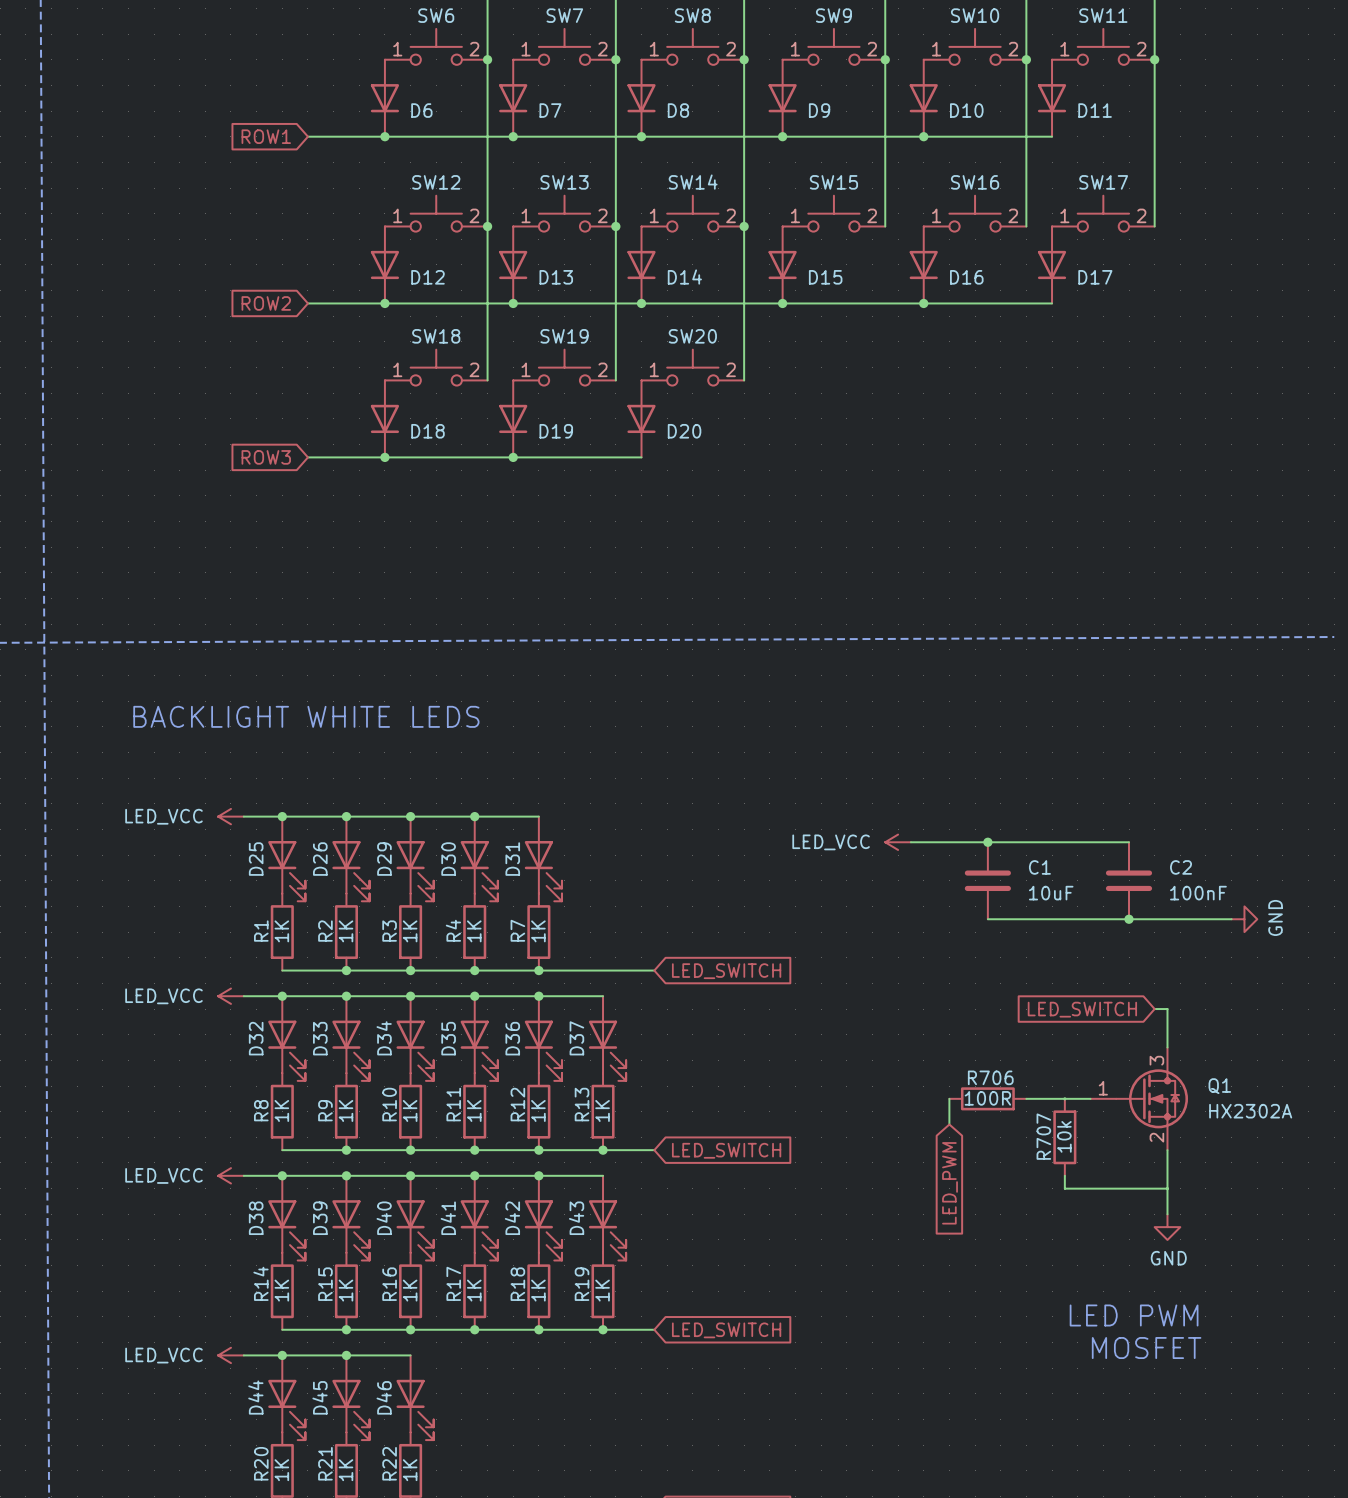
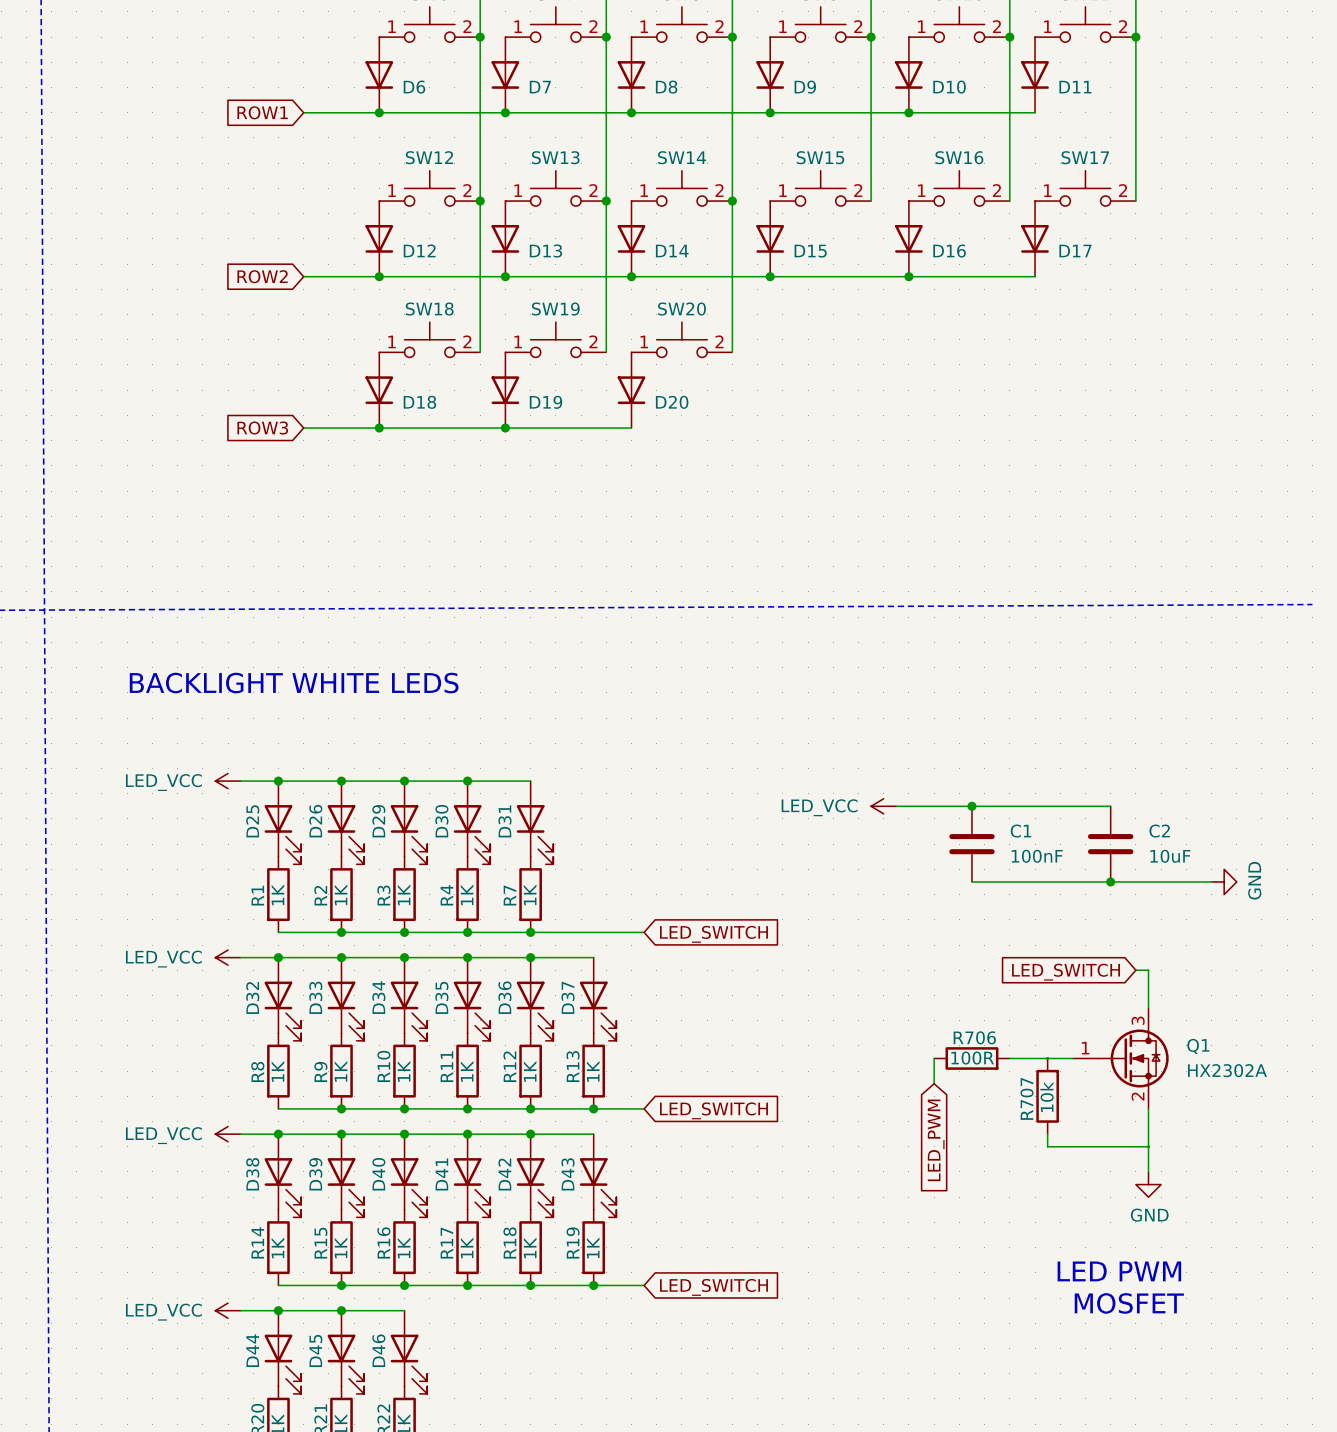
C1 value: 10uF (1051, 893) -> 100nF (1037, 856)
C2 value: 100nF (1198, 893) -> 10uF (1170, 856)

